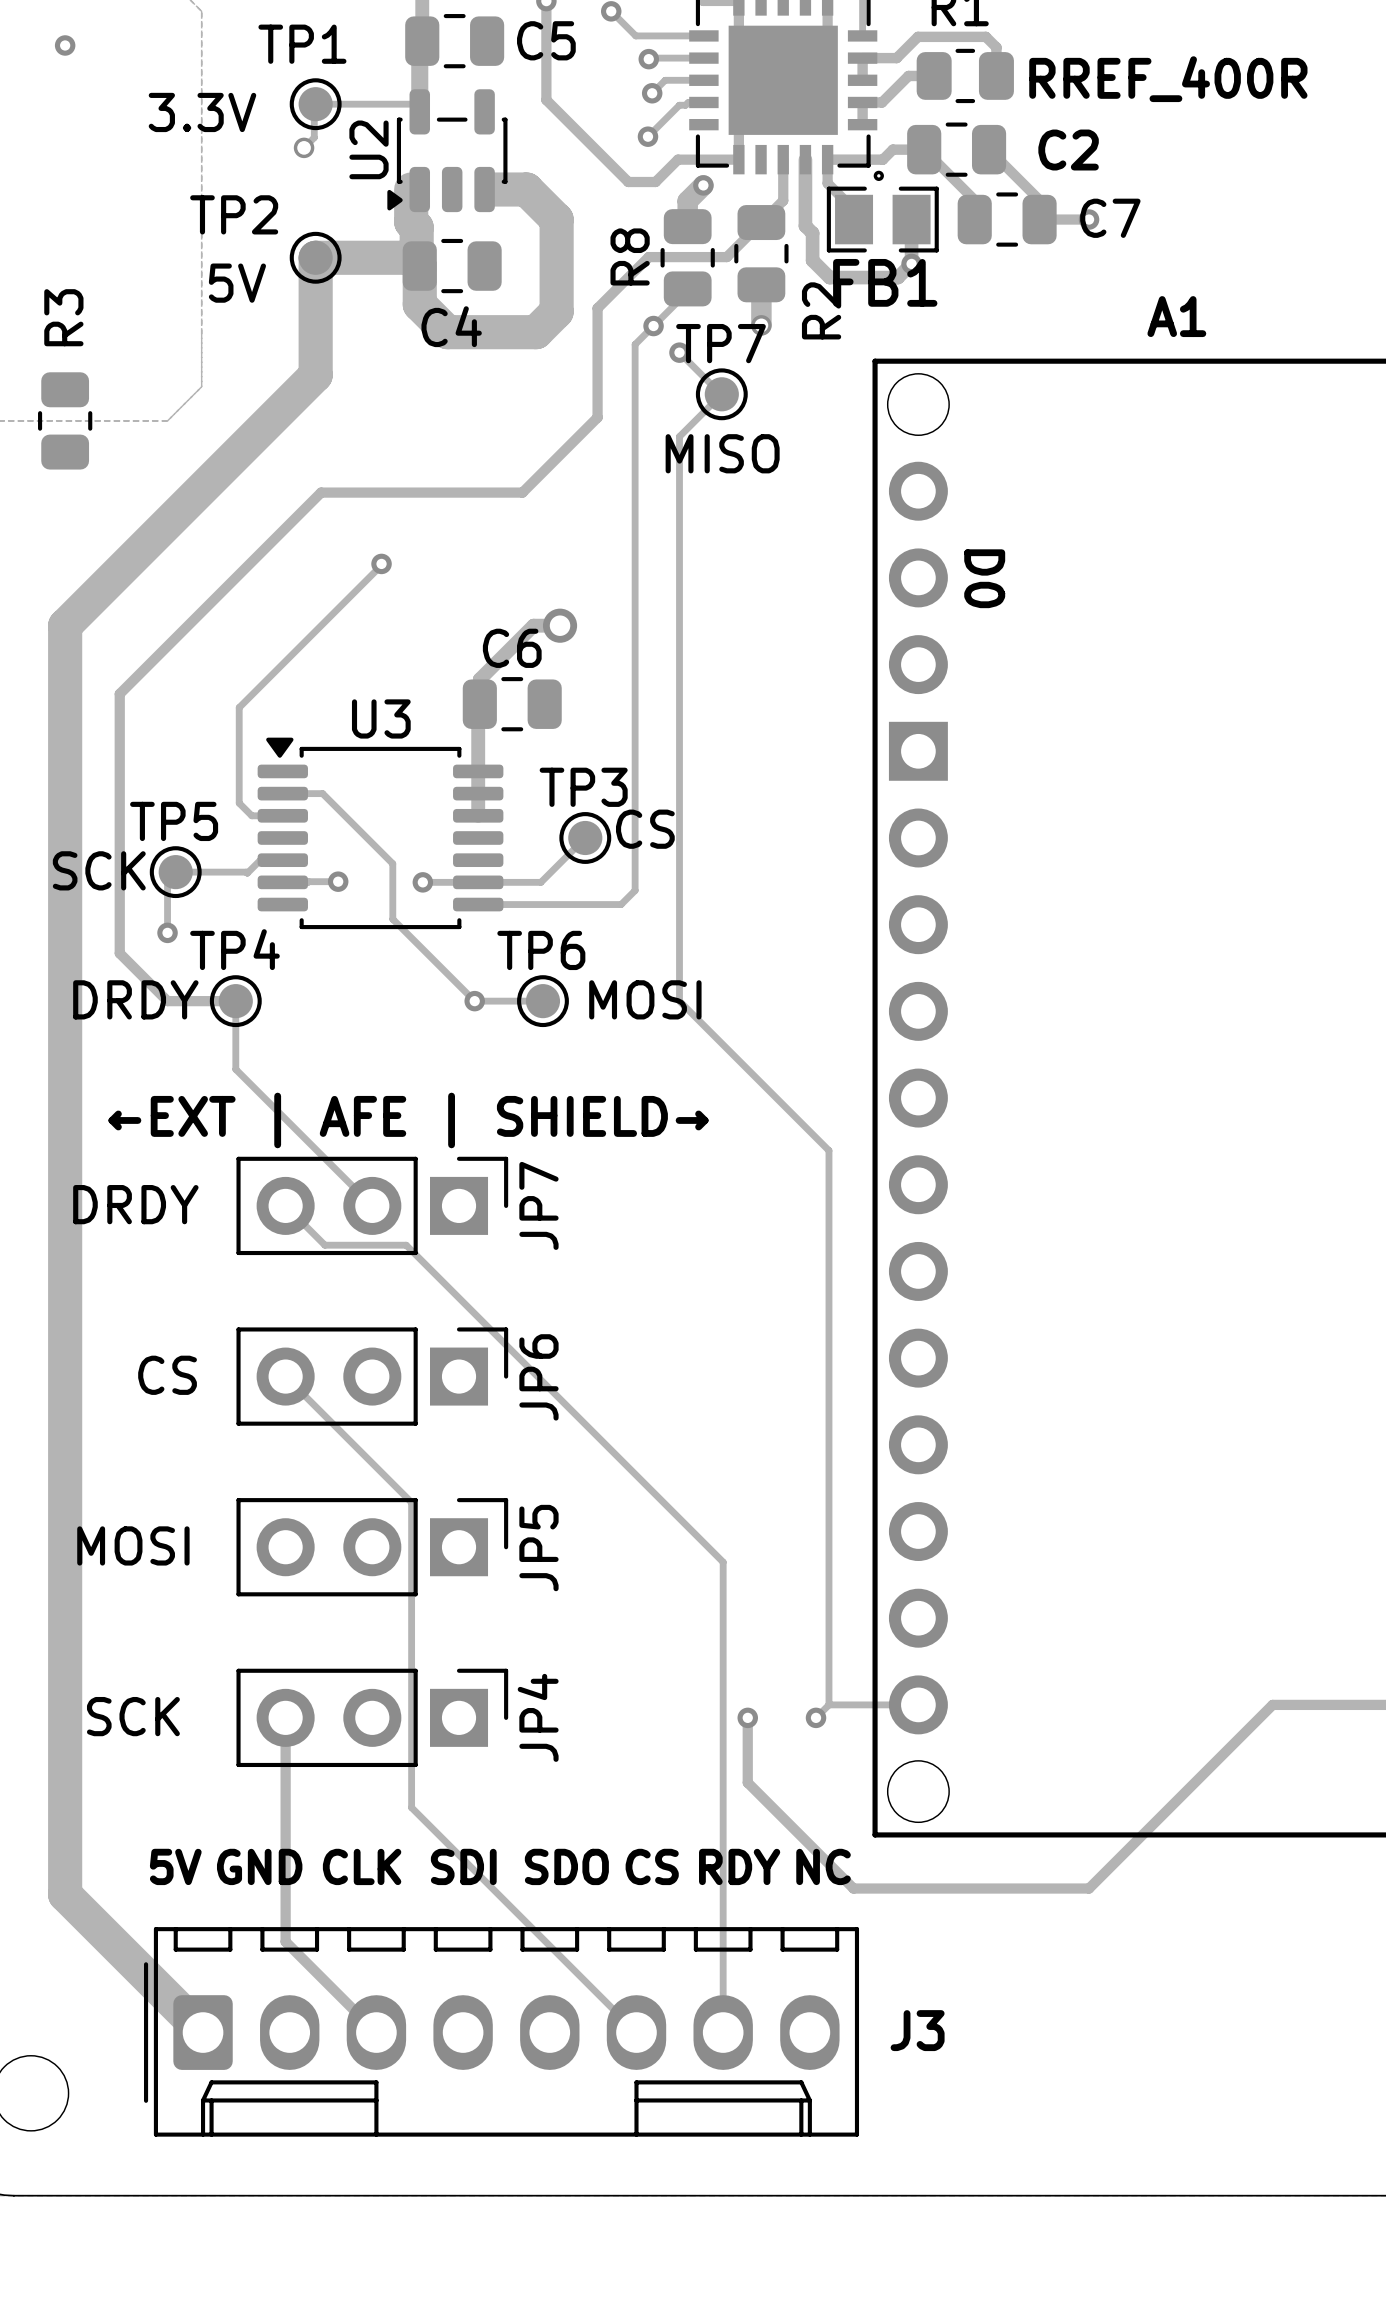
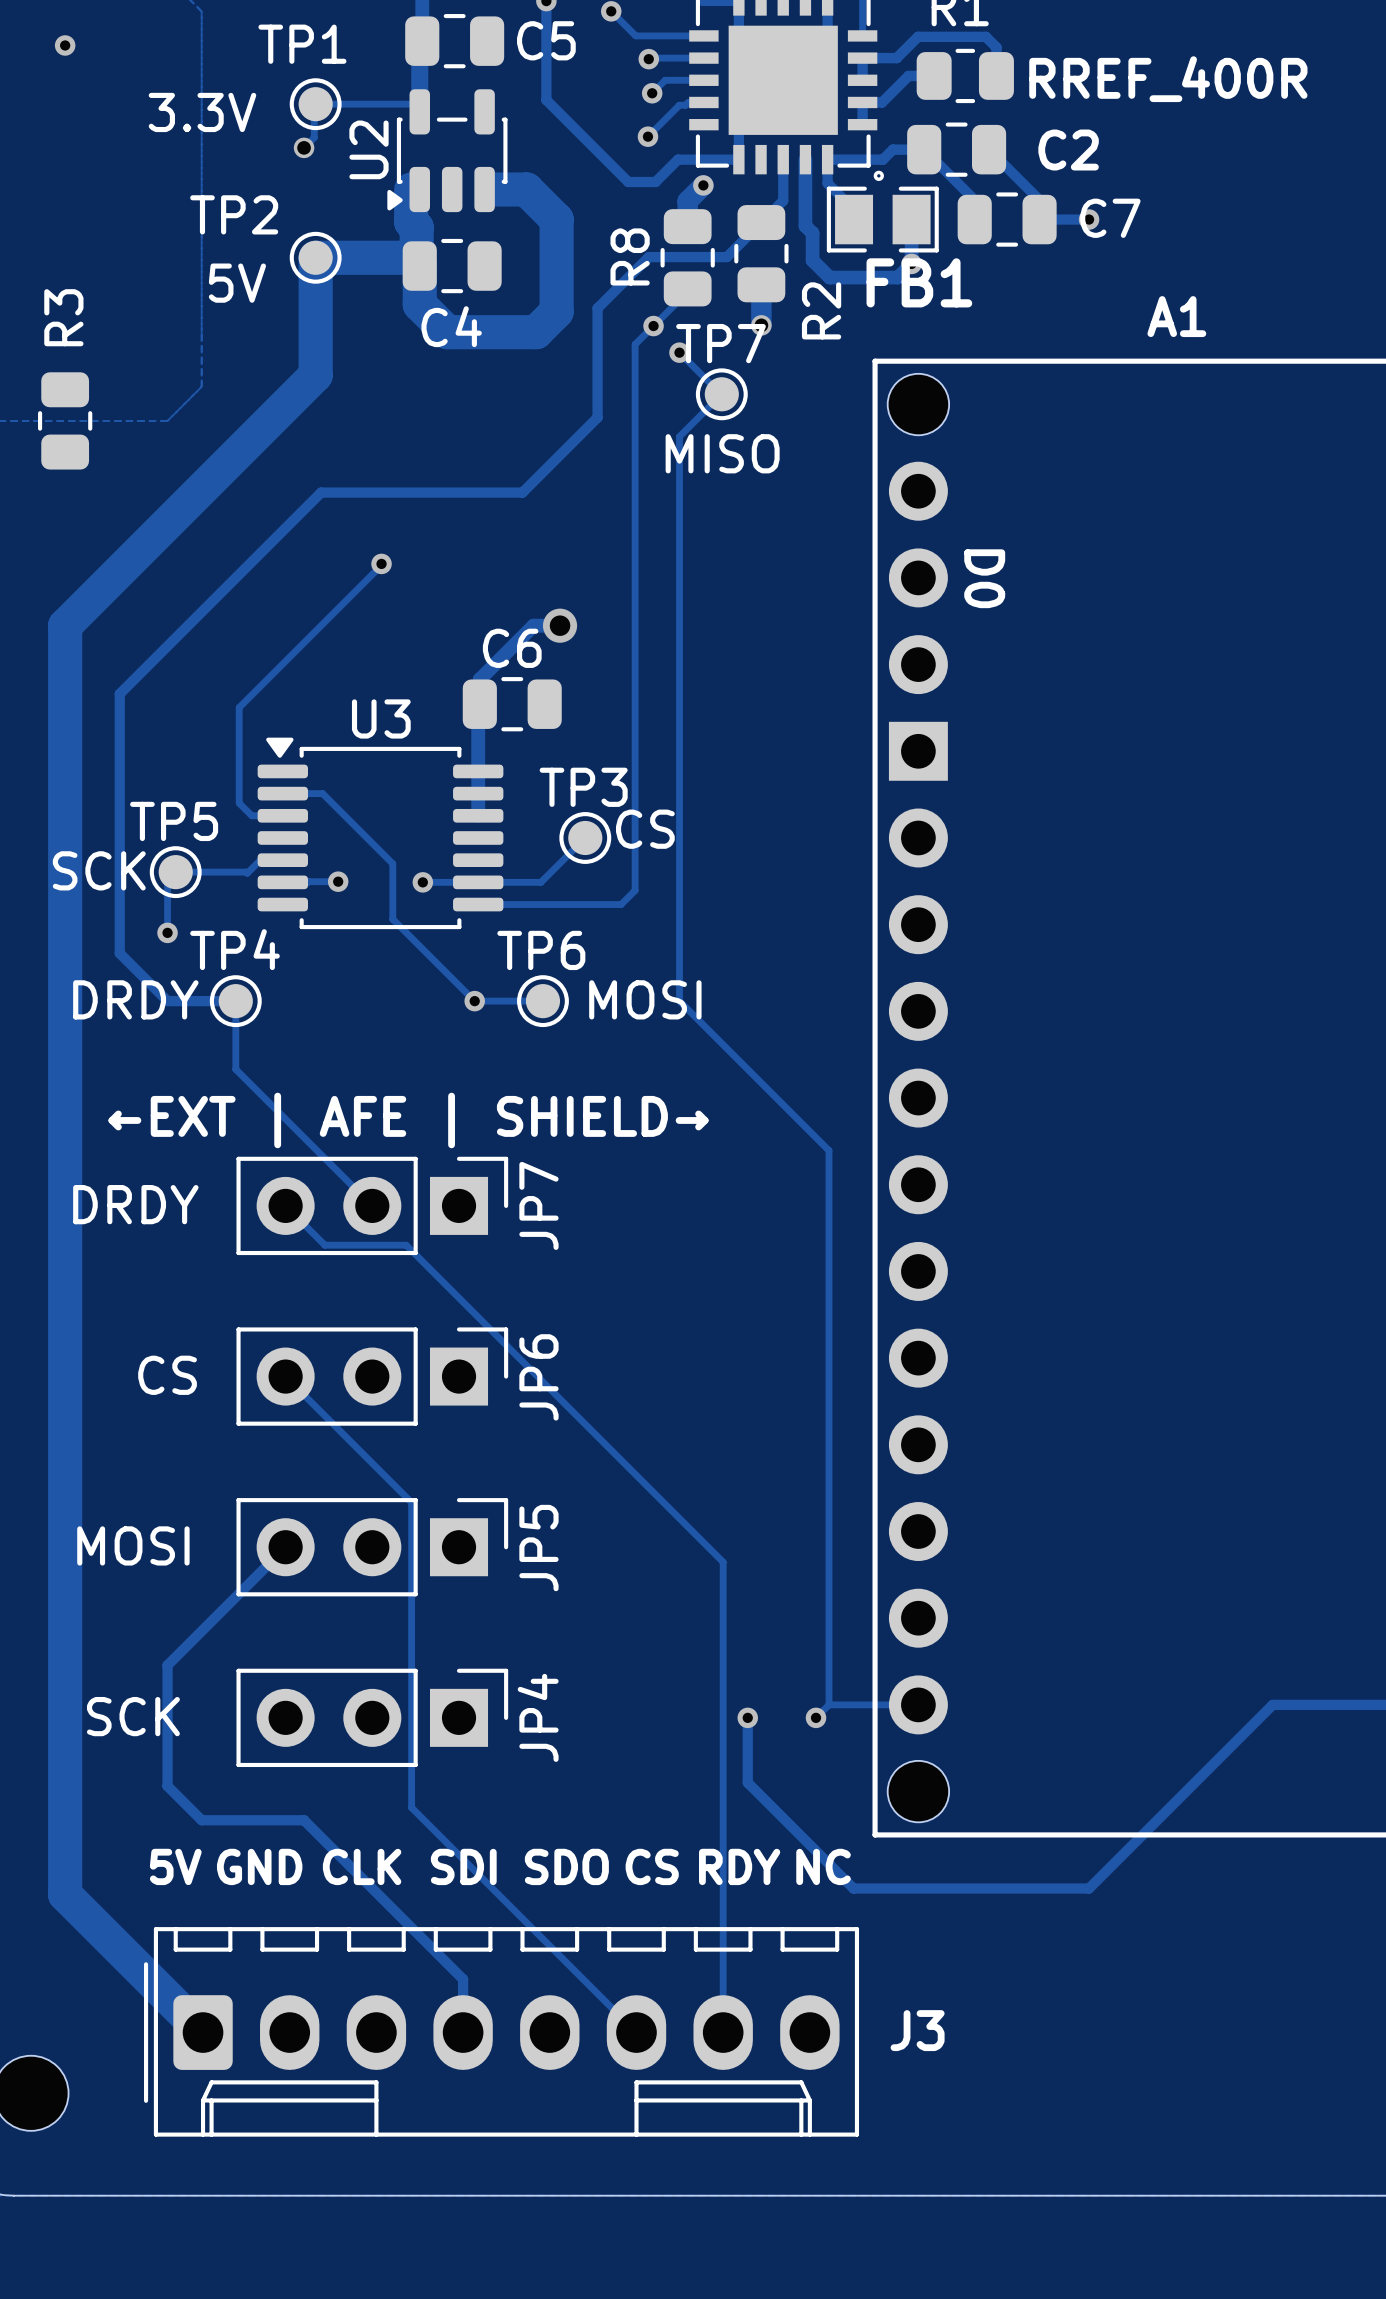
FB1 name position: FB1 (885, 282) -> FB1 (919, 282)
track: none -> (285, 1547) (167, 1665) (167, 1786) (201, 1820) (304, 1820) (463, 1979) (463, 2032)
track: (285, 1717) (285, 1941) (376, 2032) -> none

